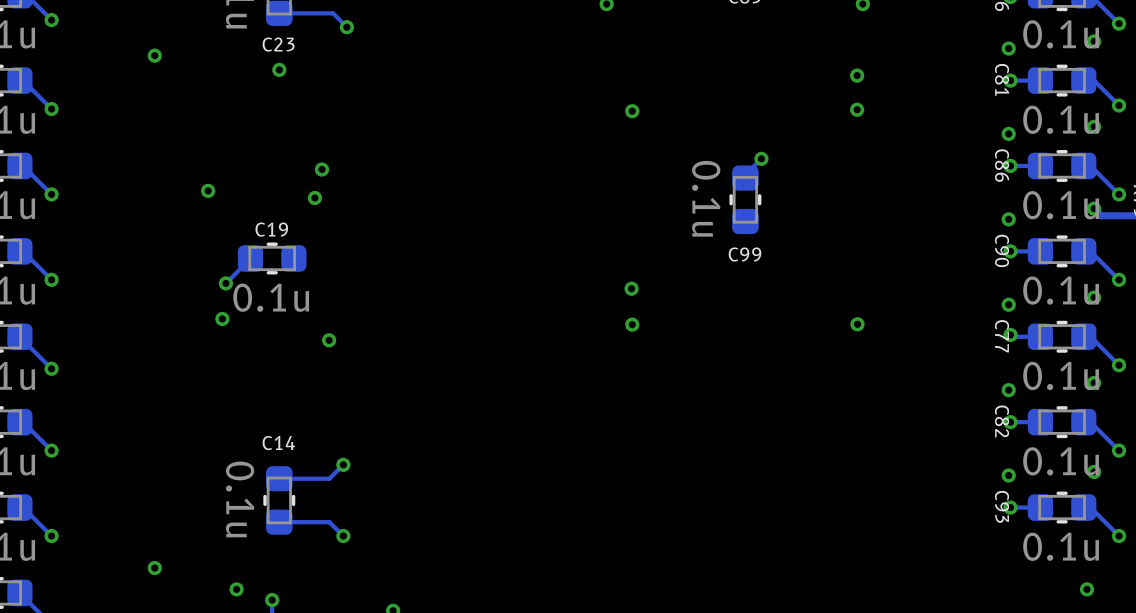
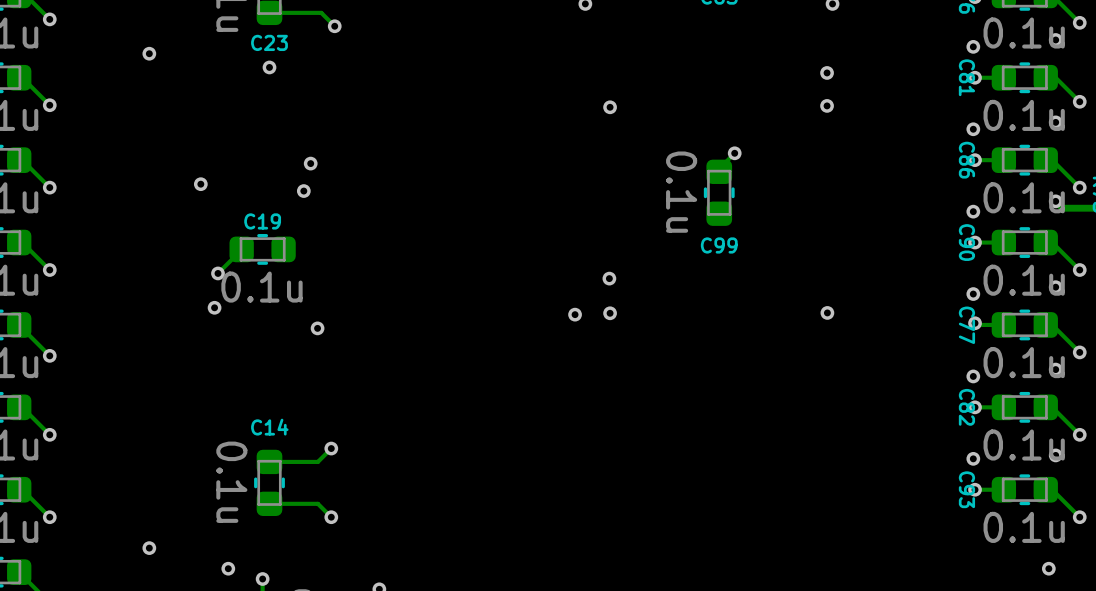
via: none -> (575, 314)

